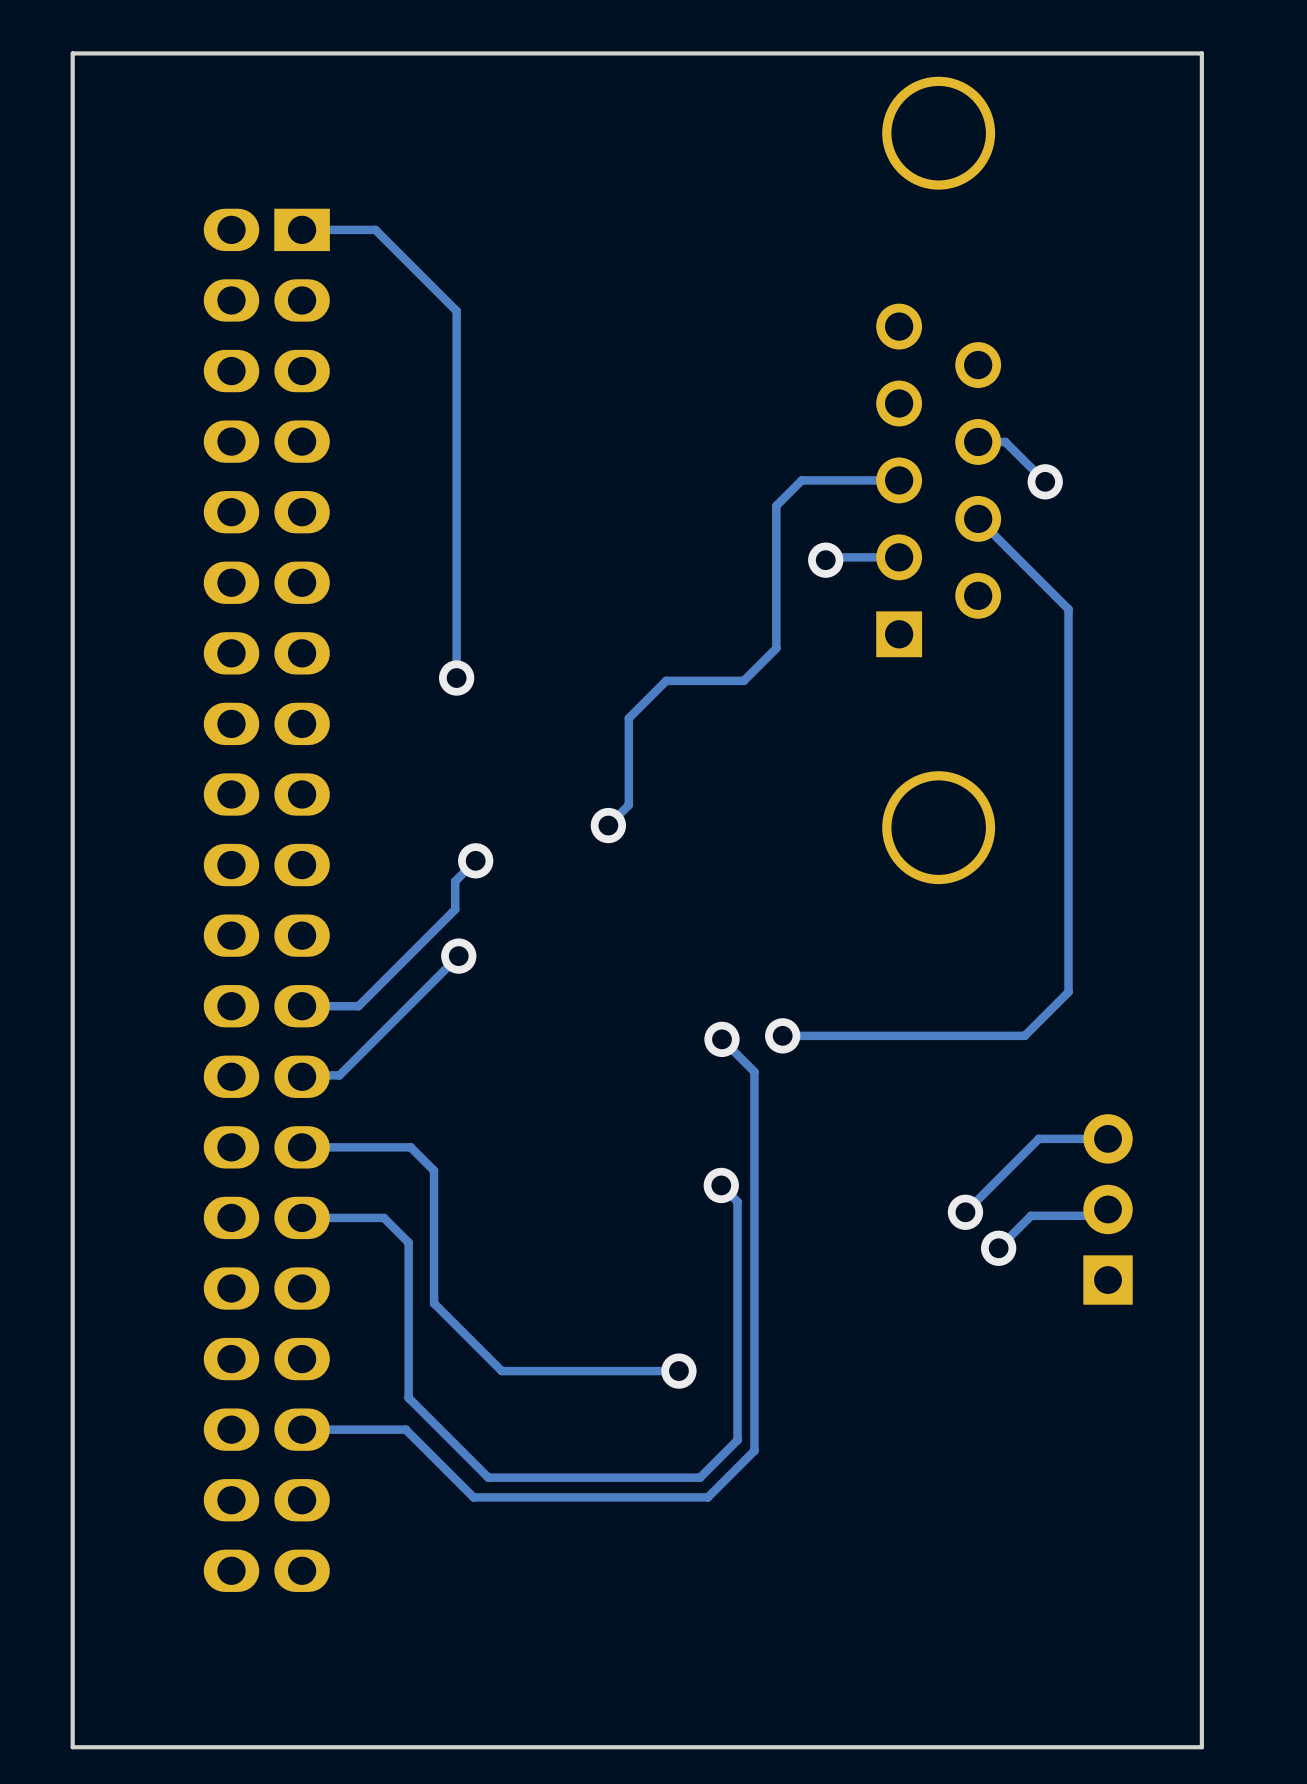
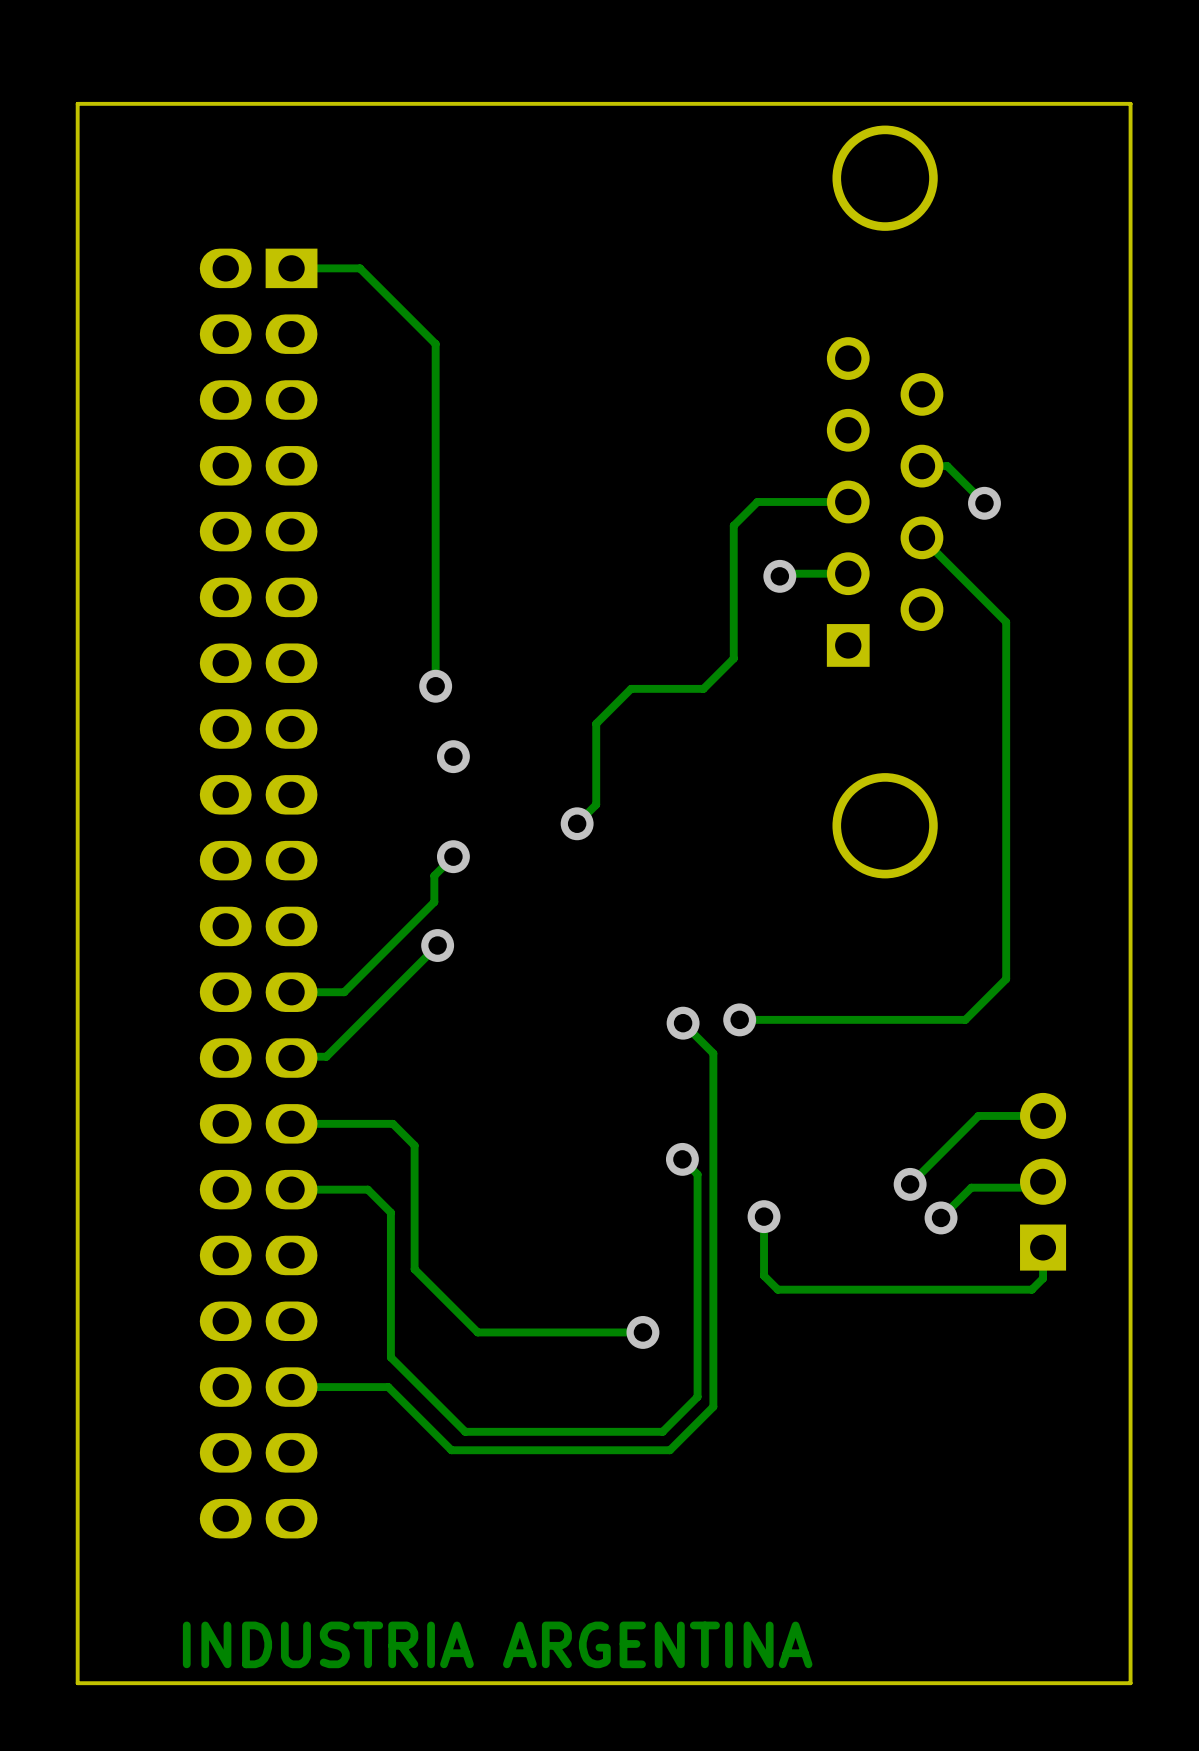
via: none -> (453, 756)
track: none -> (764, 1216) (764, 1275) (777, 1289) (1031, 1289) (1043, 1278) (1043, 1247)
via: none -> (764, 1216)
text: none -> INDUSTRIA ARGENTINA (497, 1644)

